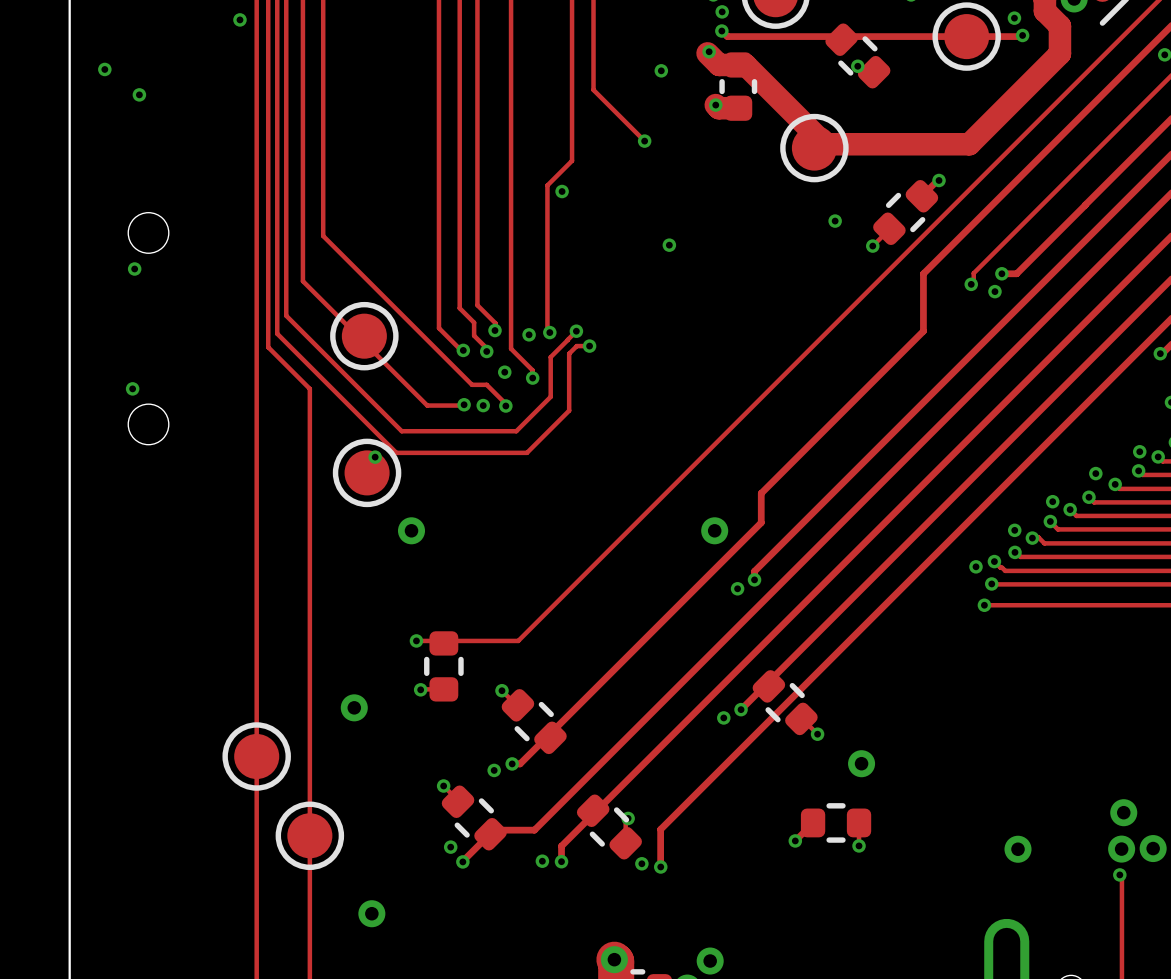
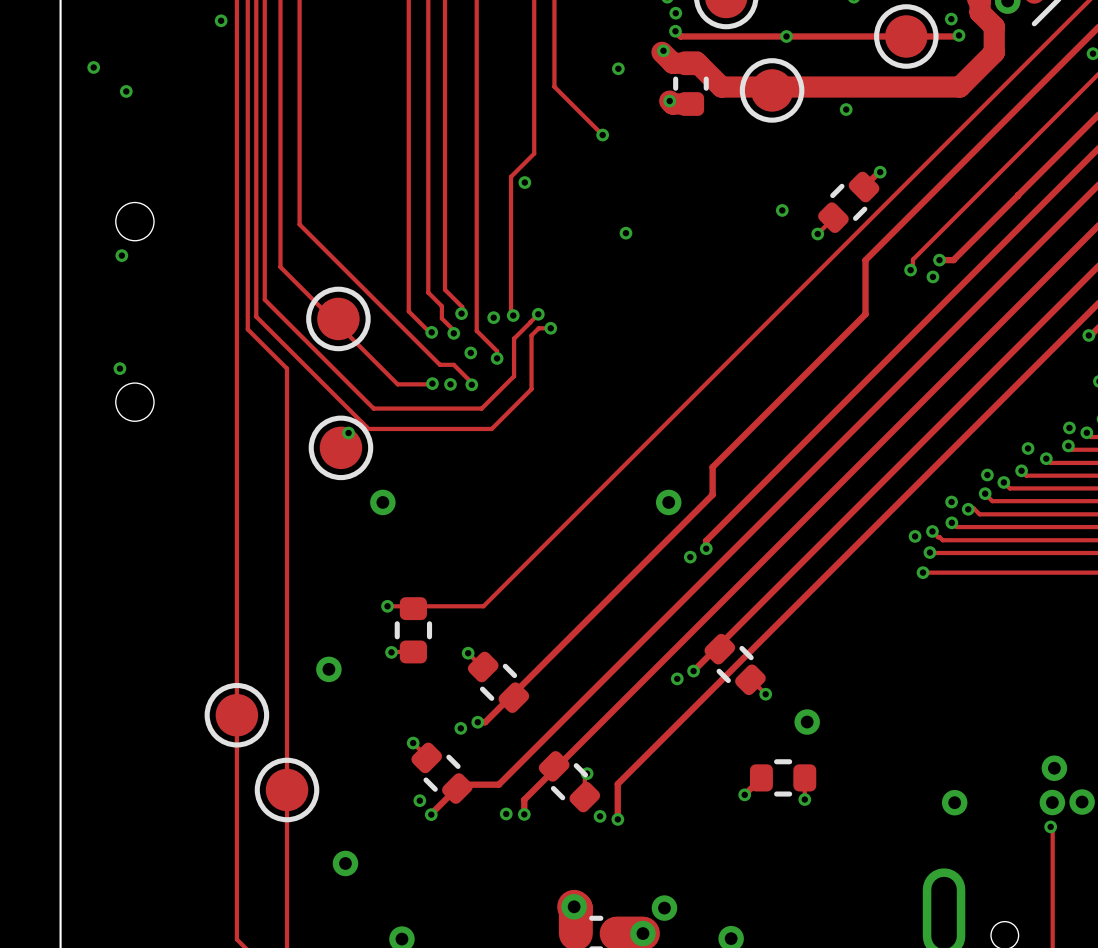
via: none -> (786, 36)
part: (857, 55) -> none
via: (857, 66) -> none
track: (770, 90) (824, 144) (969, 144) (1023, 90) -> (721, 87) (959, 87)
via: none -> (846, 109)
part position: (814, 148) -> (772, 90)

